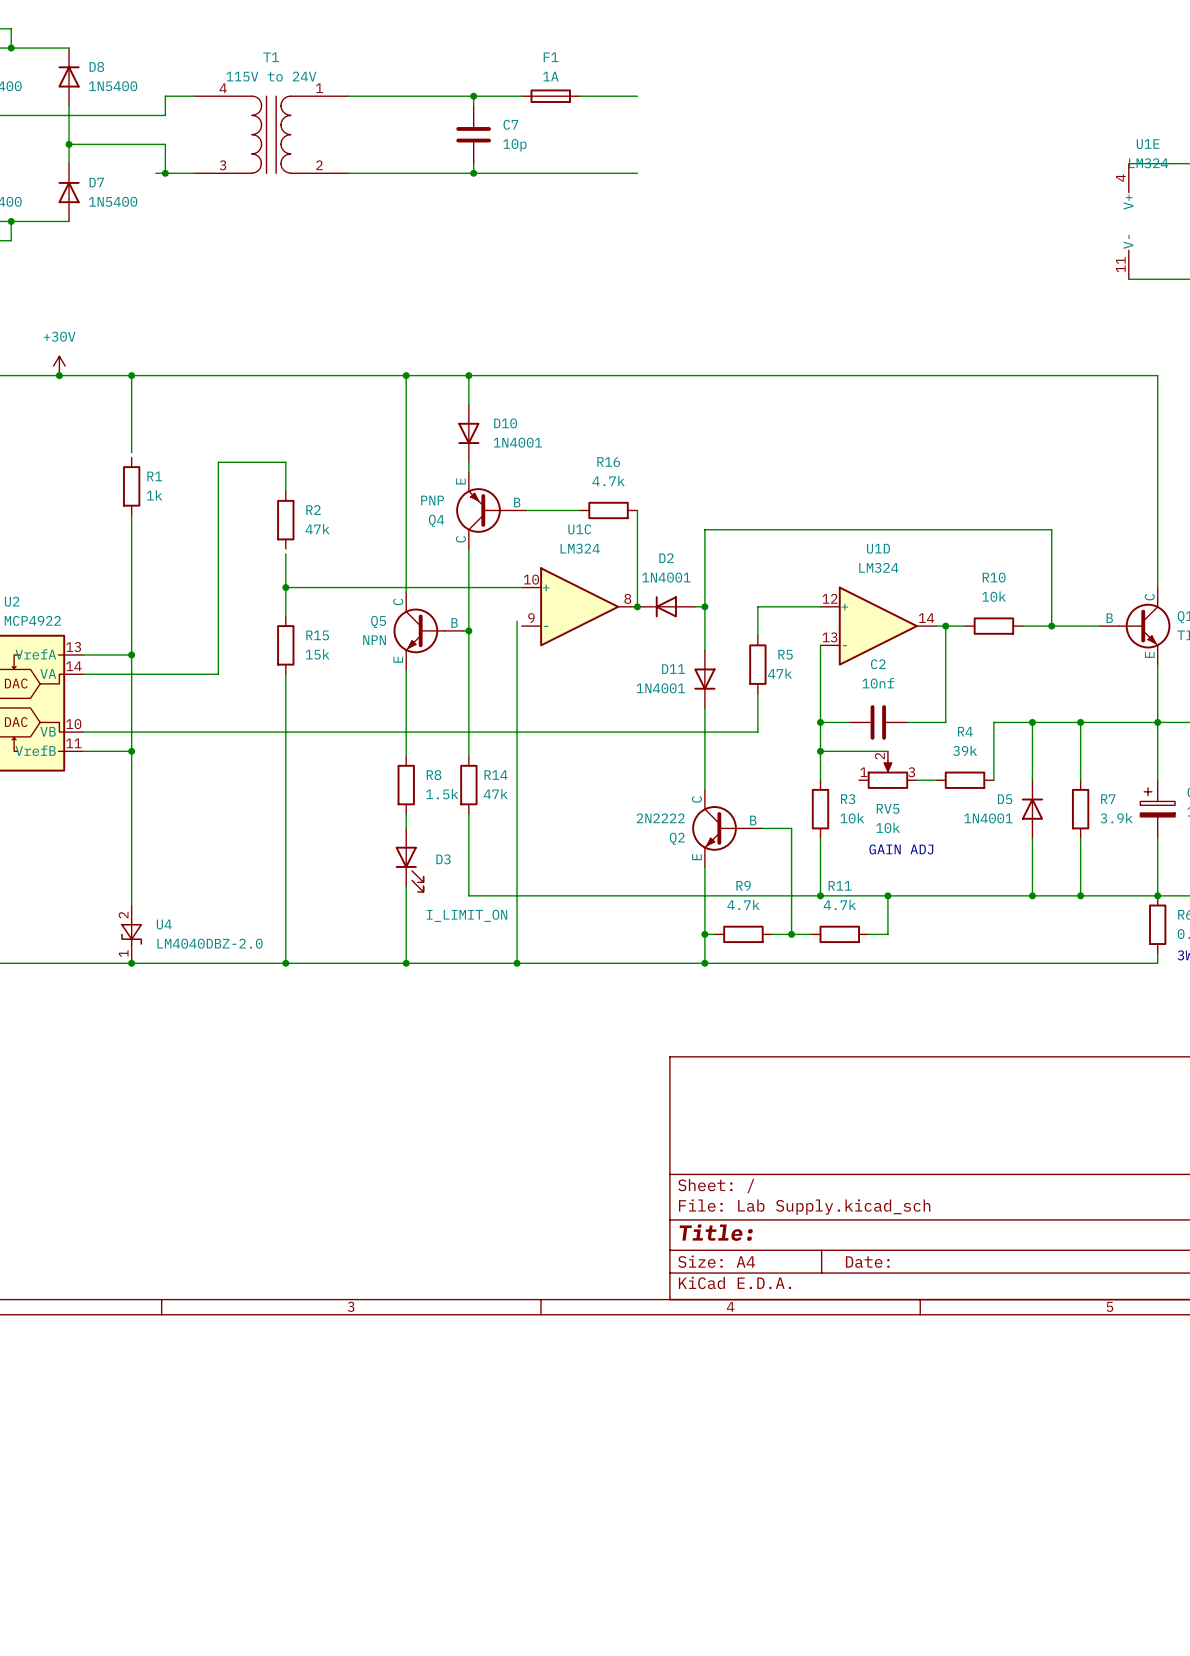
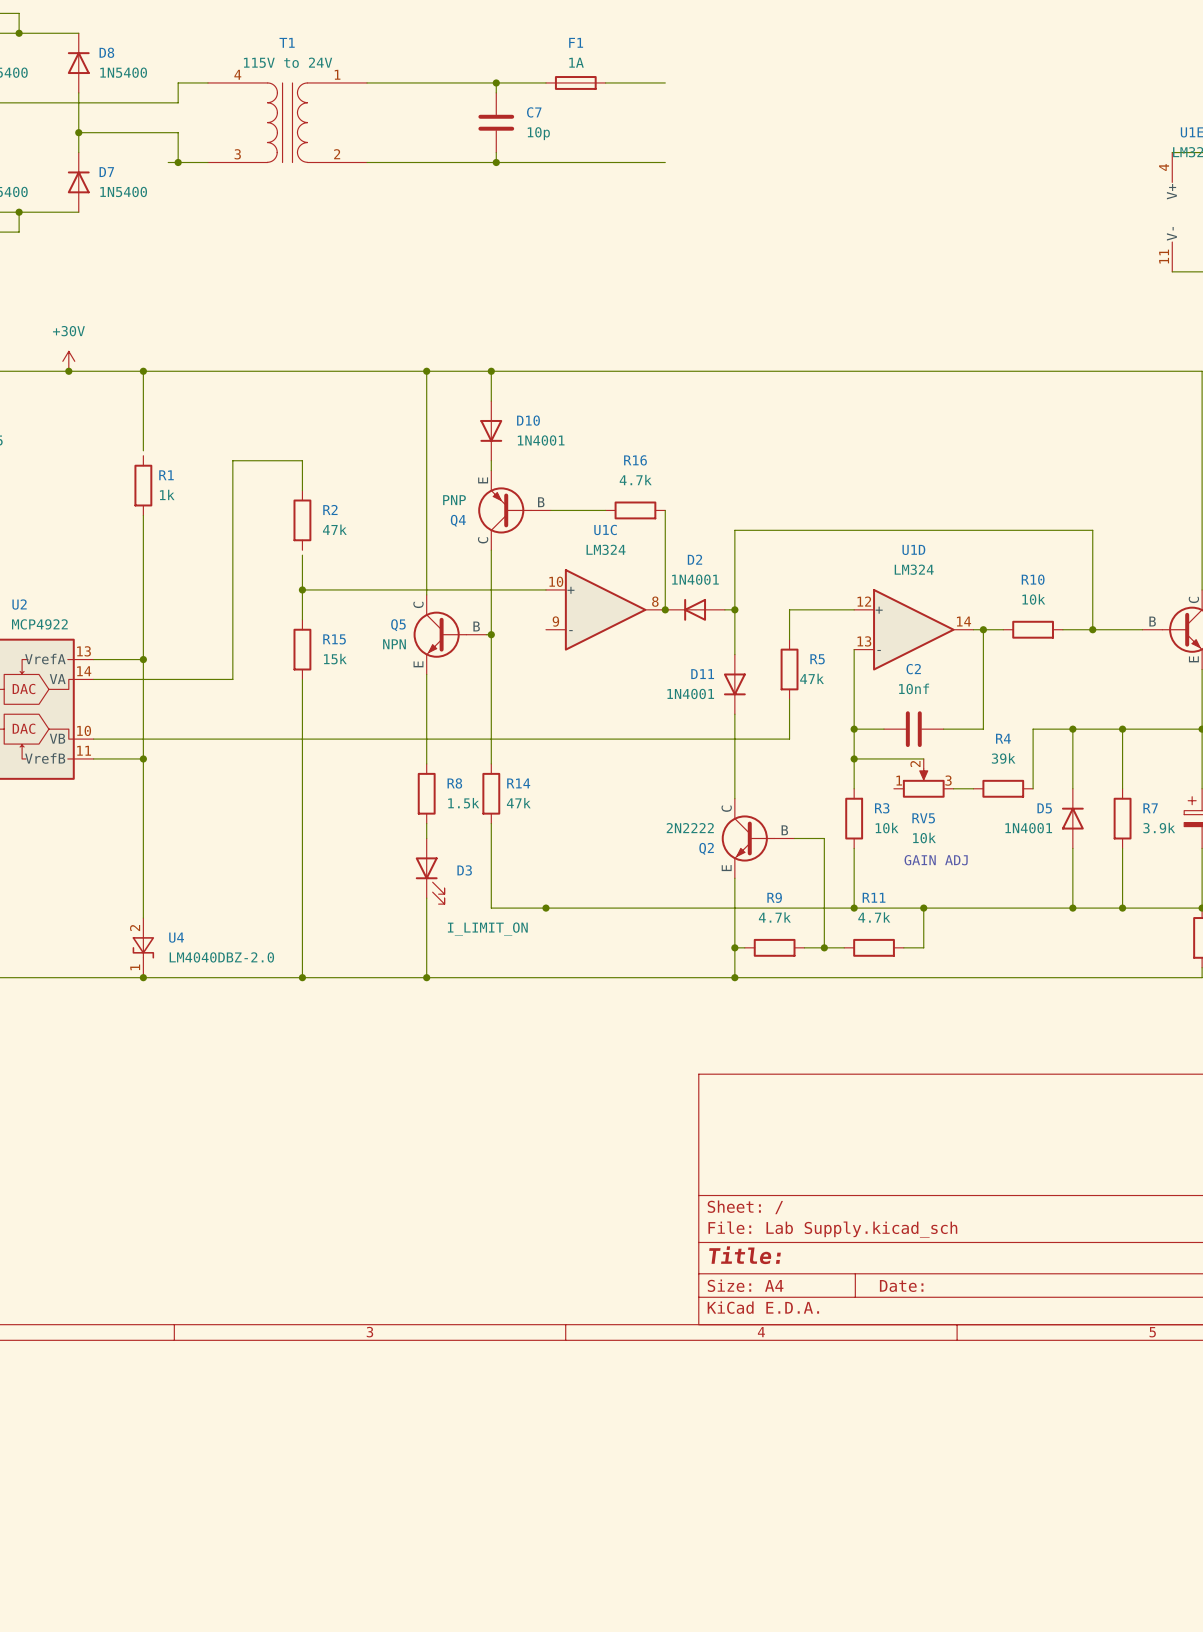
wire: (517, 621) (517, 963) -> none
junction: none -> (545, 908)
junction: (517, 963) -> none

